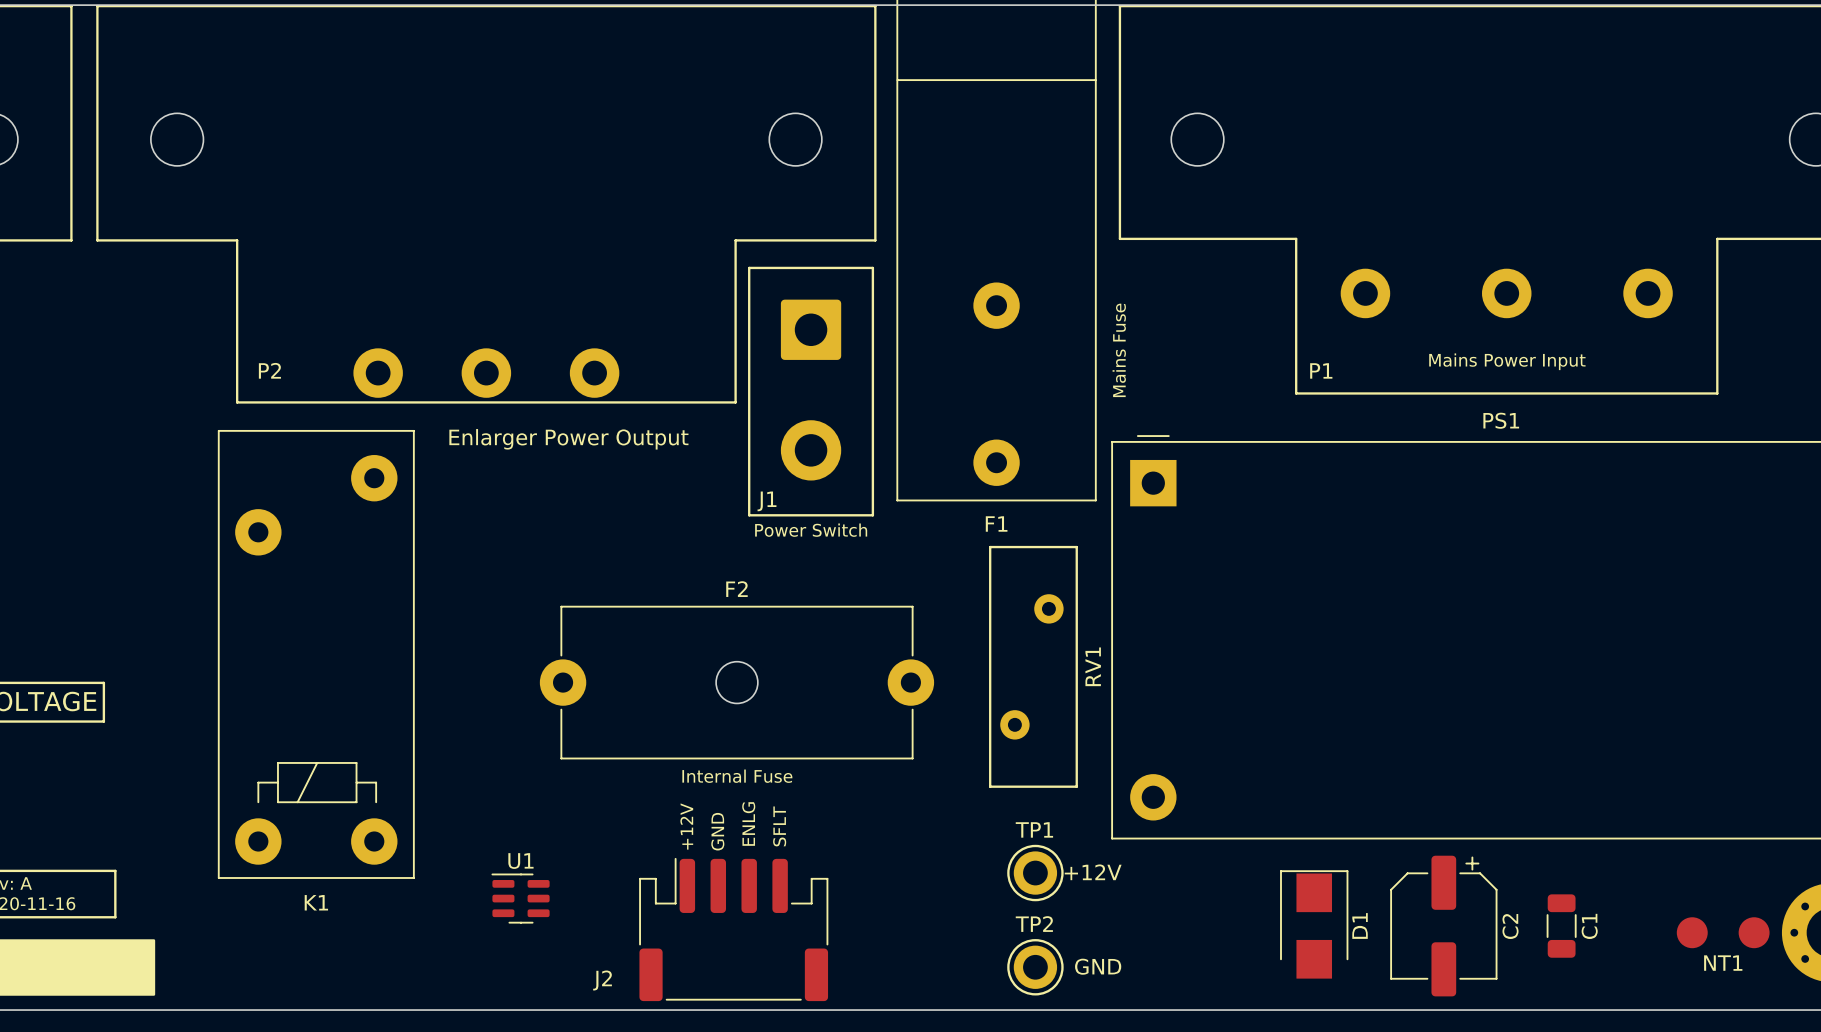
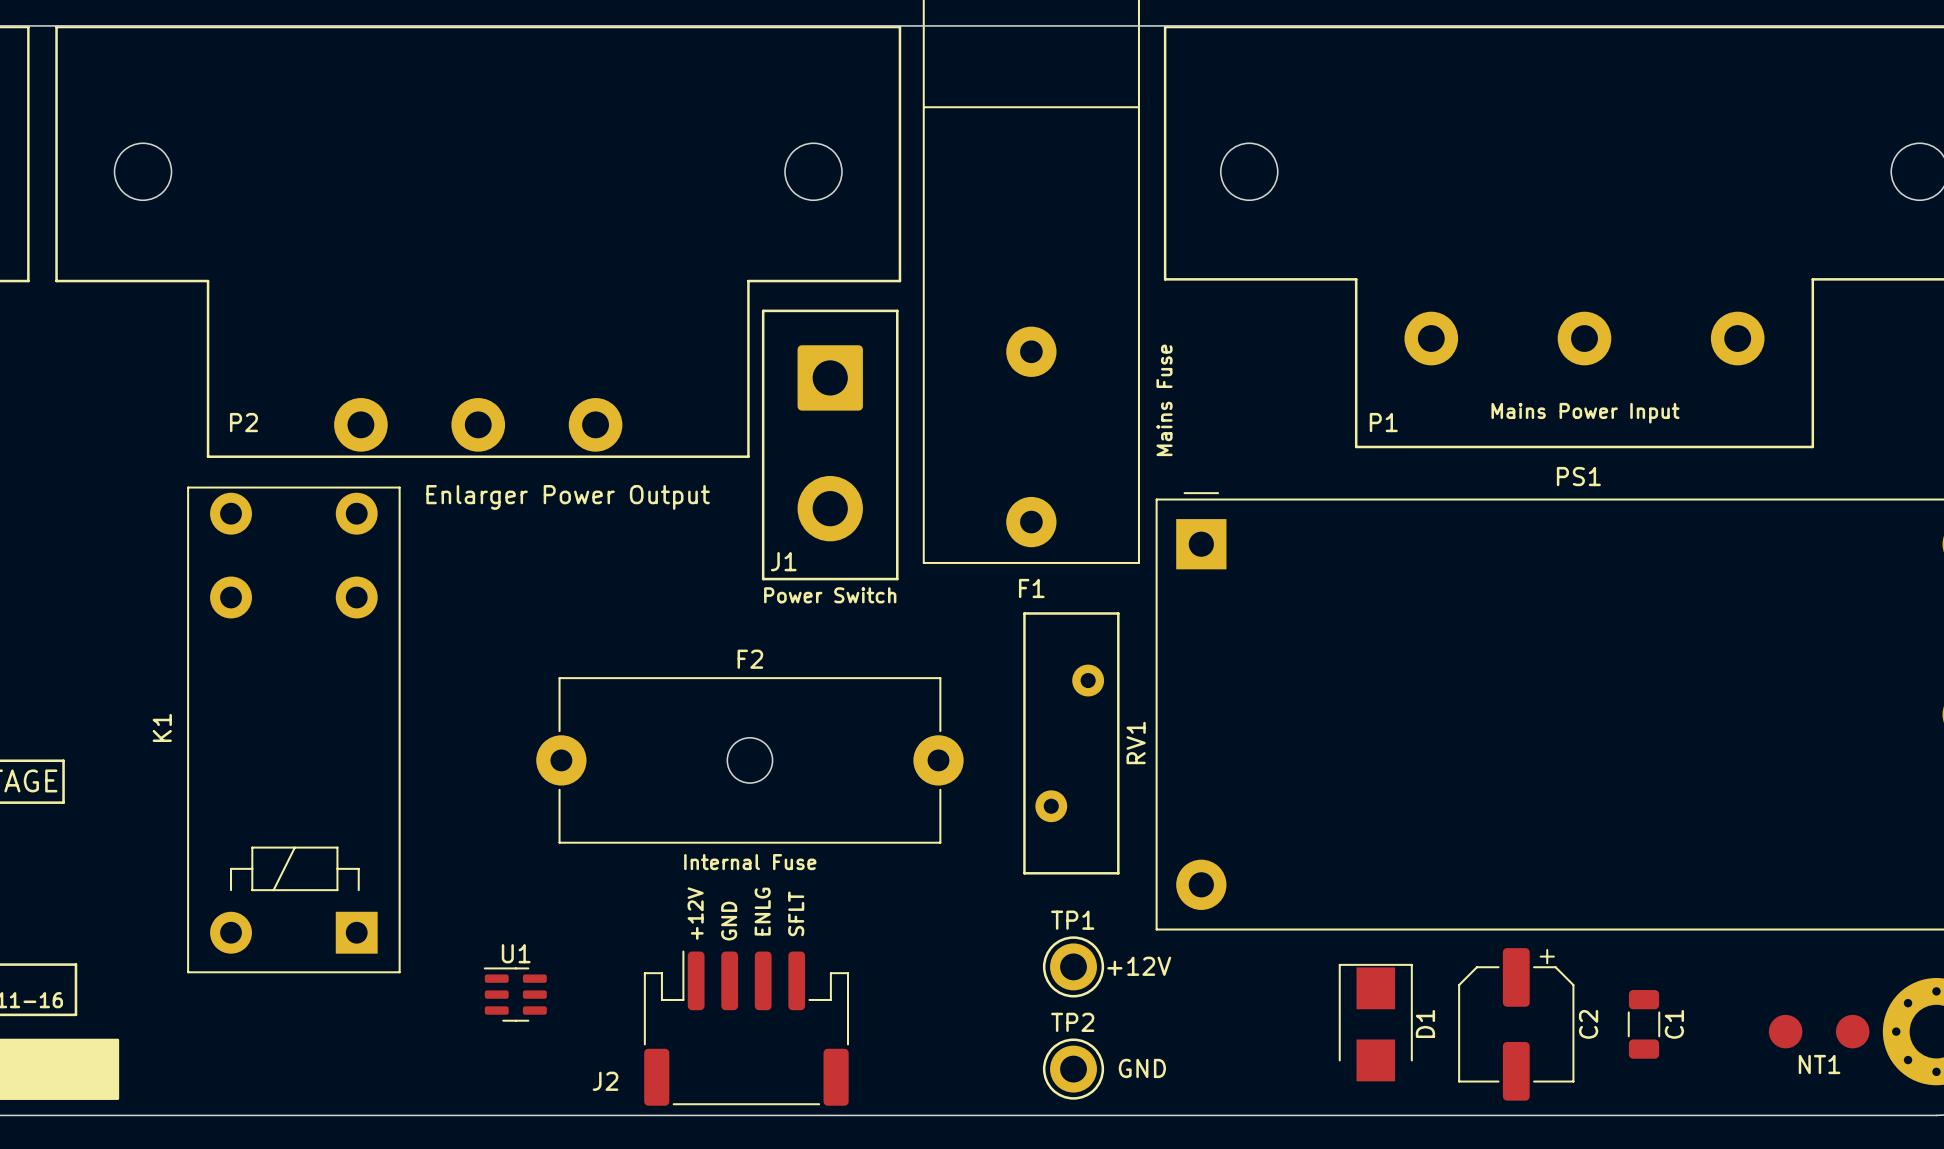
K1 footprint: [217, 429, 415, 879] -> [187, 486, 401, 974]
K1 name position: K1 (316, 902) -> K1 (162, 727)

